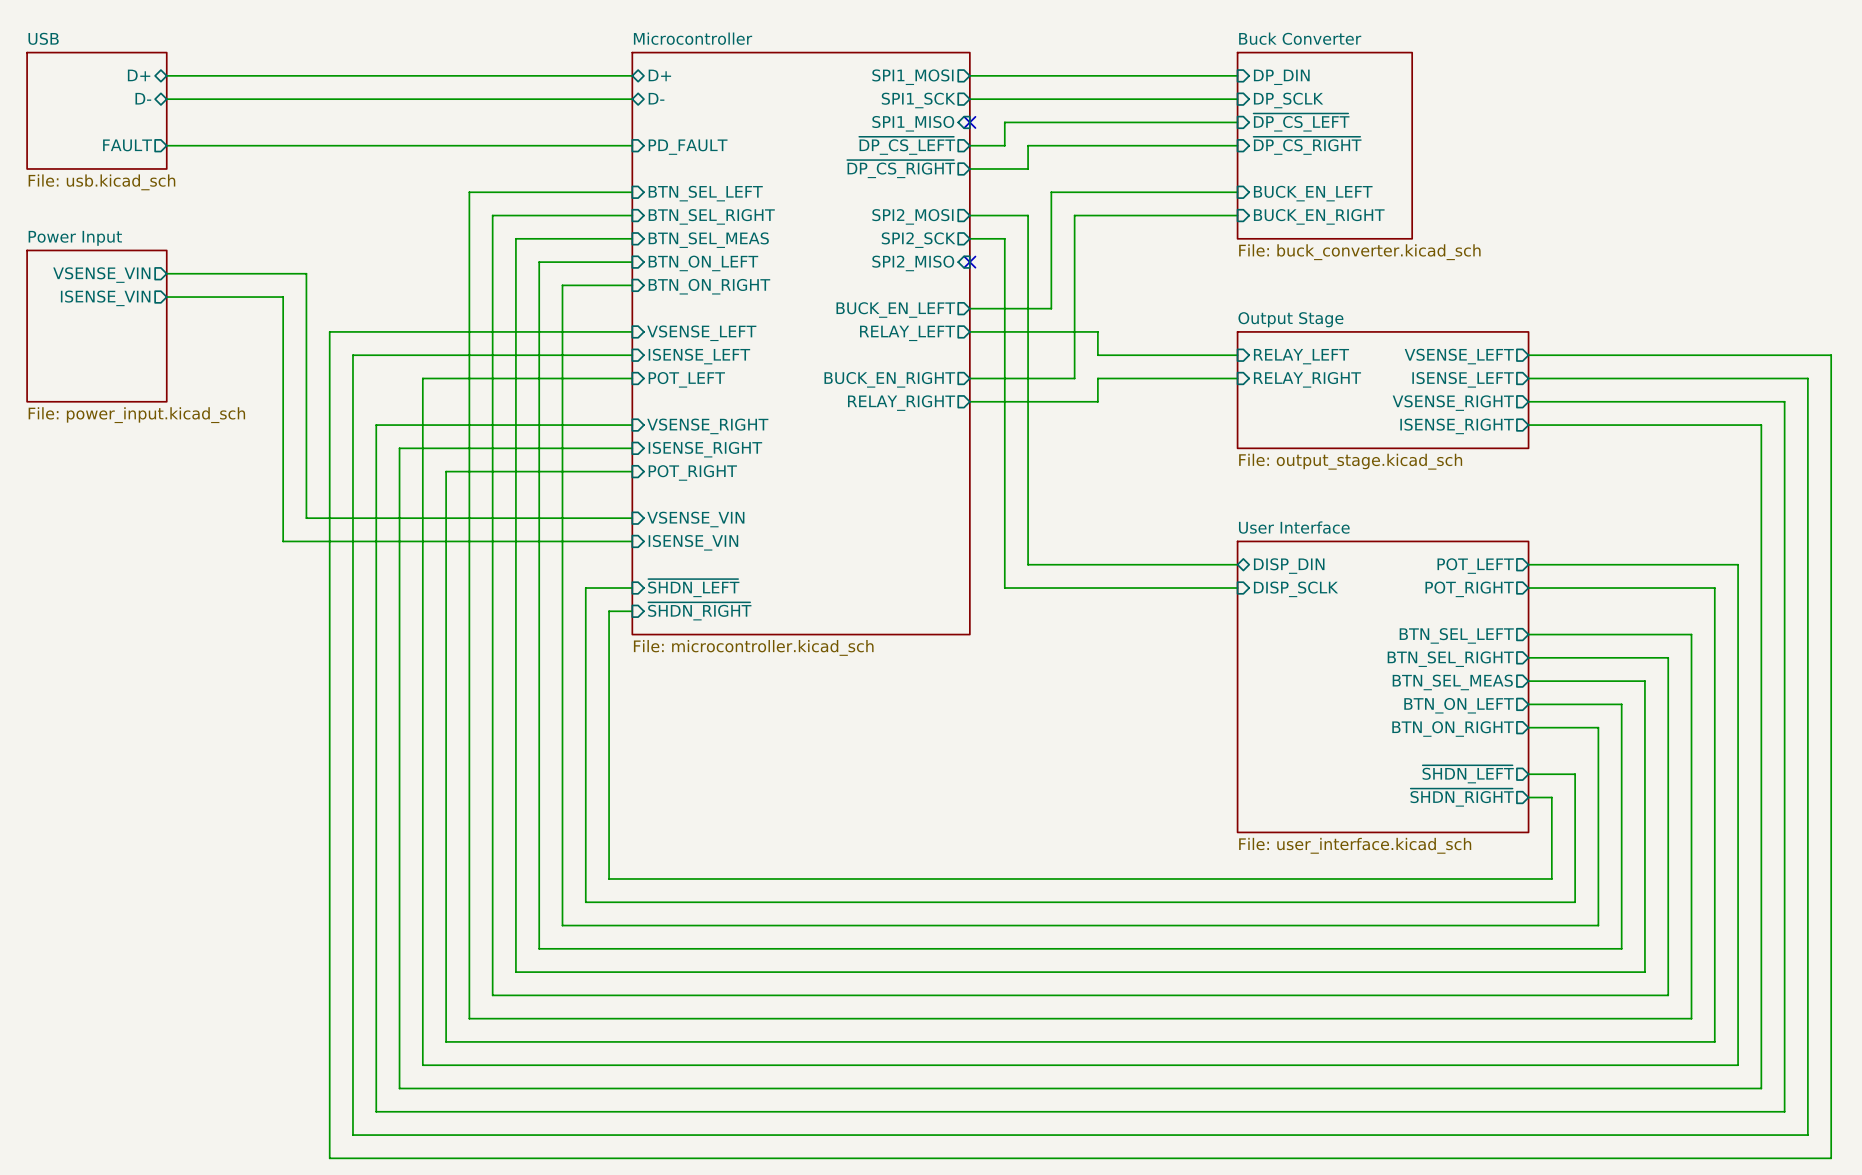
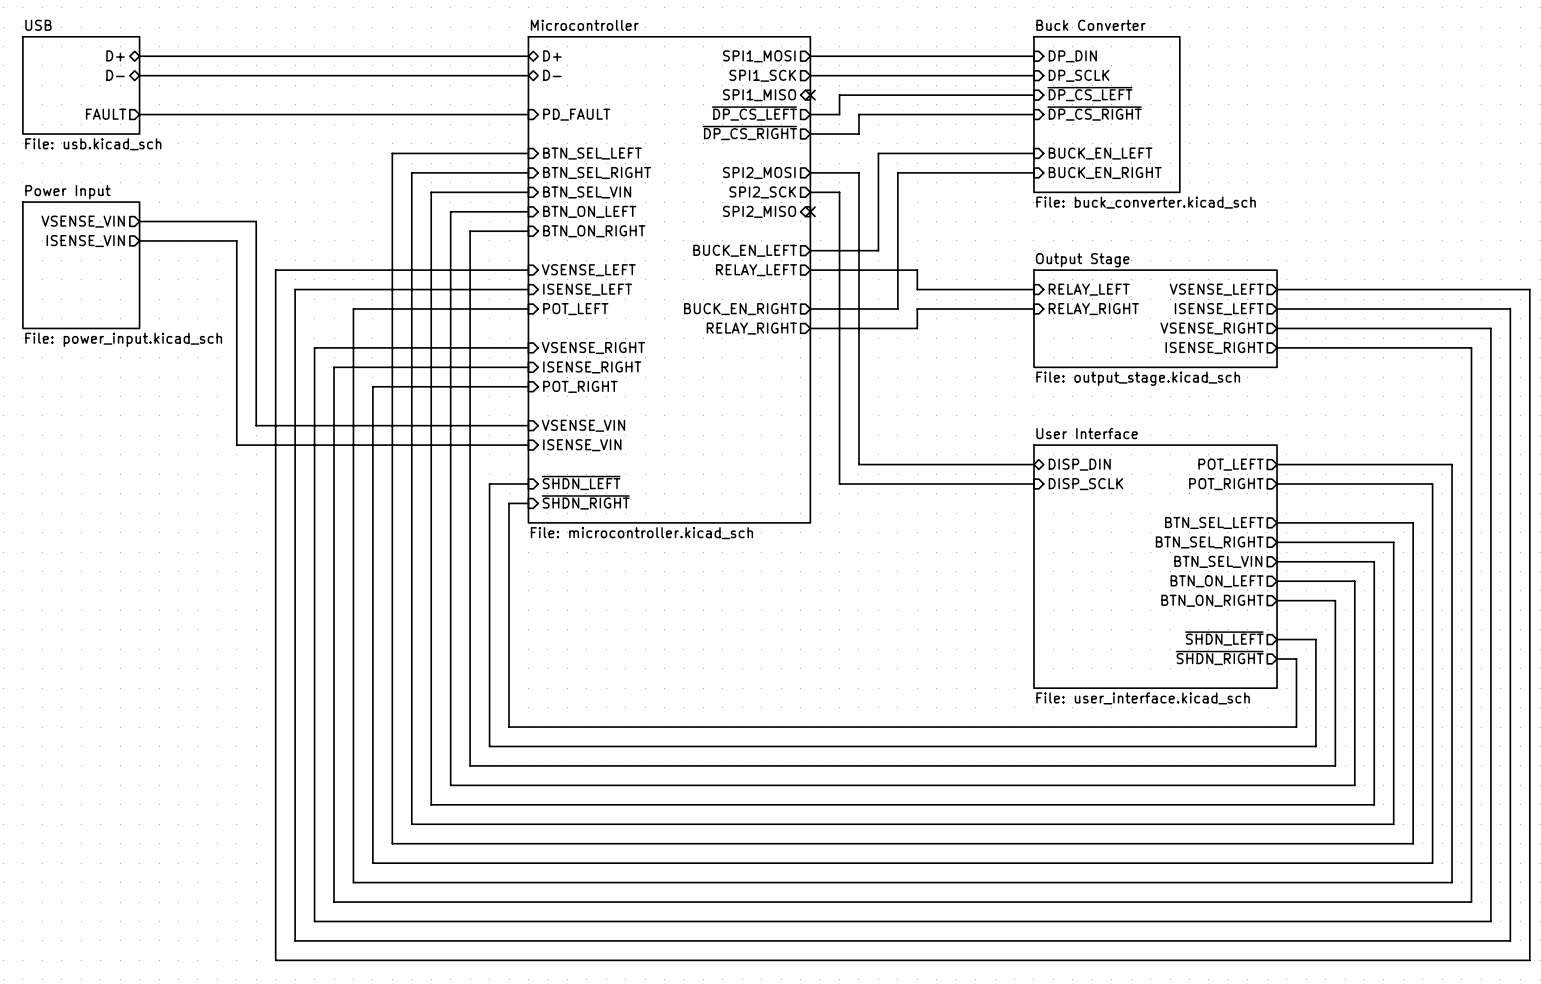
sheet pin: BTN_SEL_MEAS (708, 240) -> BTN_SEL_VIN (587, 192)
sheet pin: BTN_SEL_MEAS (1452, 682) -> BTN_SEL_VIN (1218, 561)

